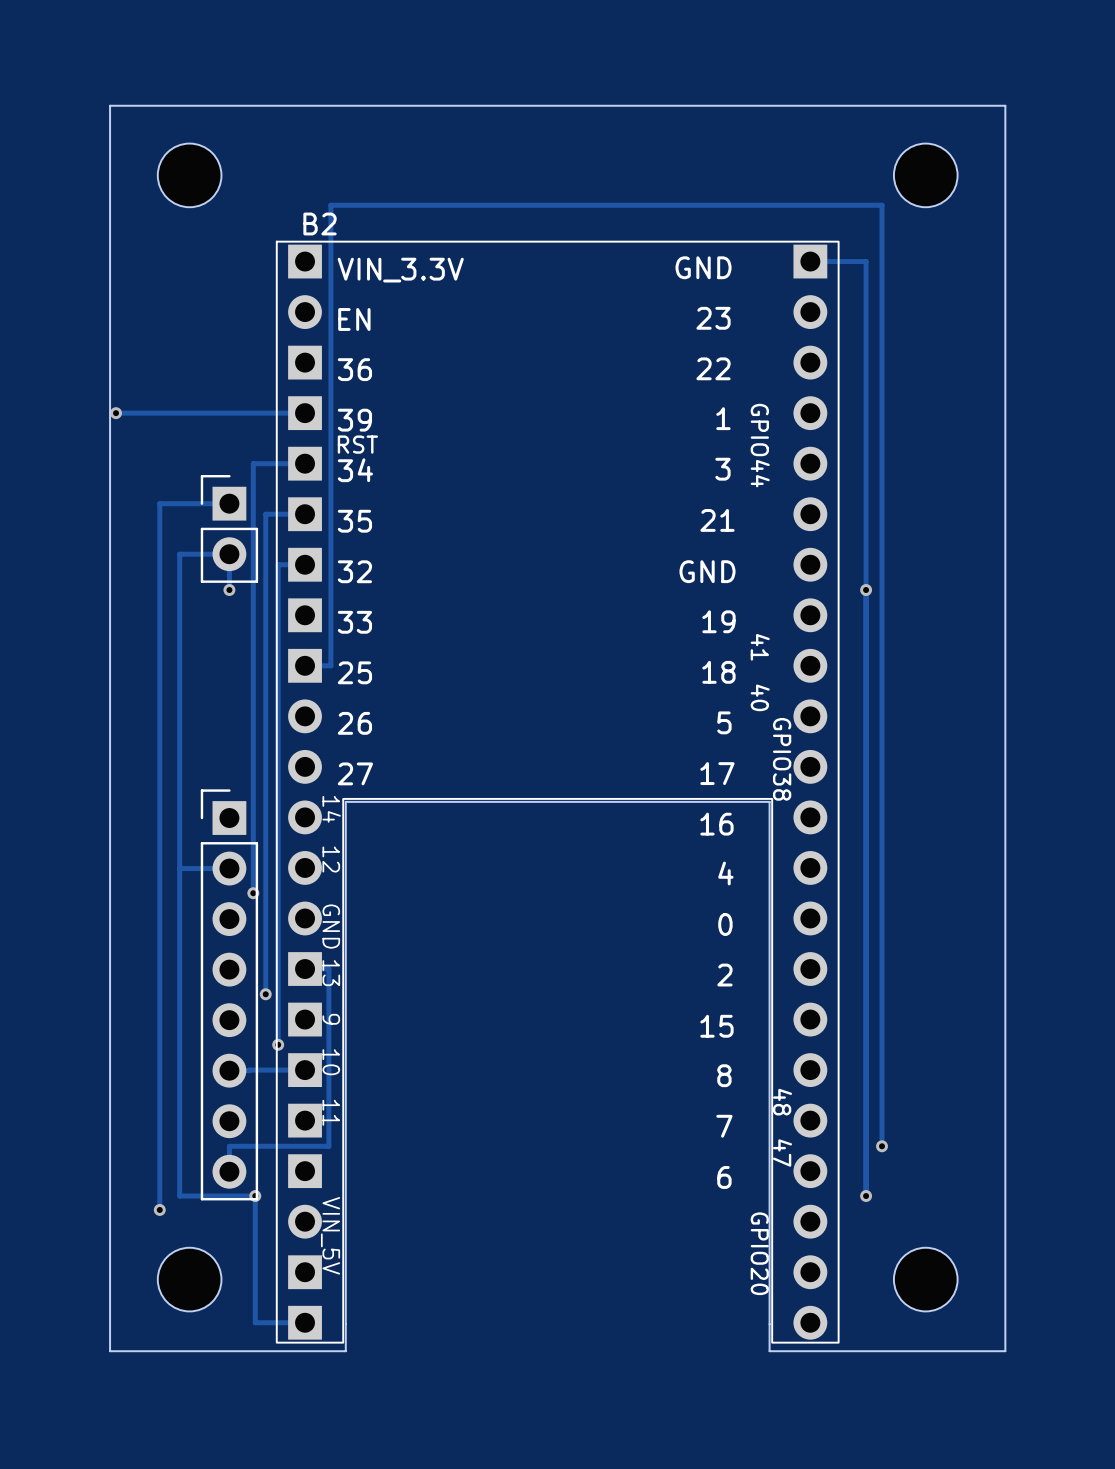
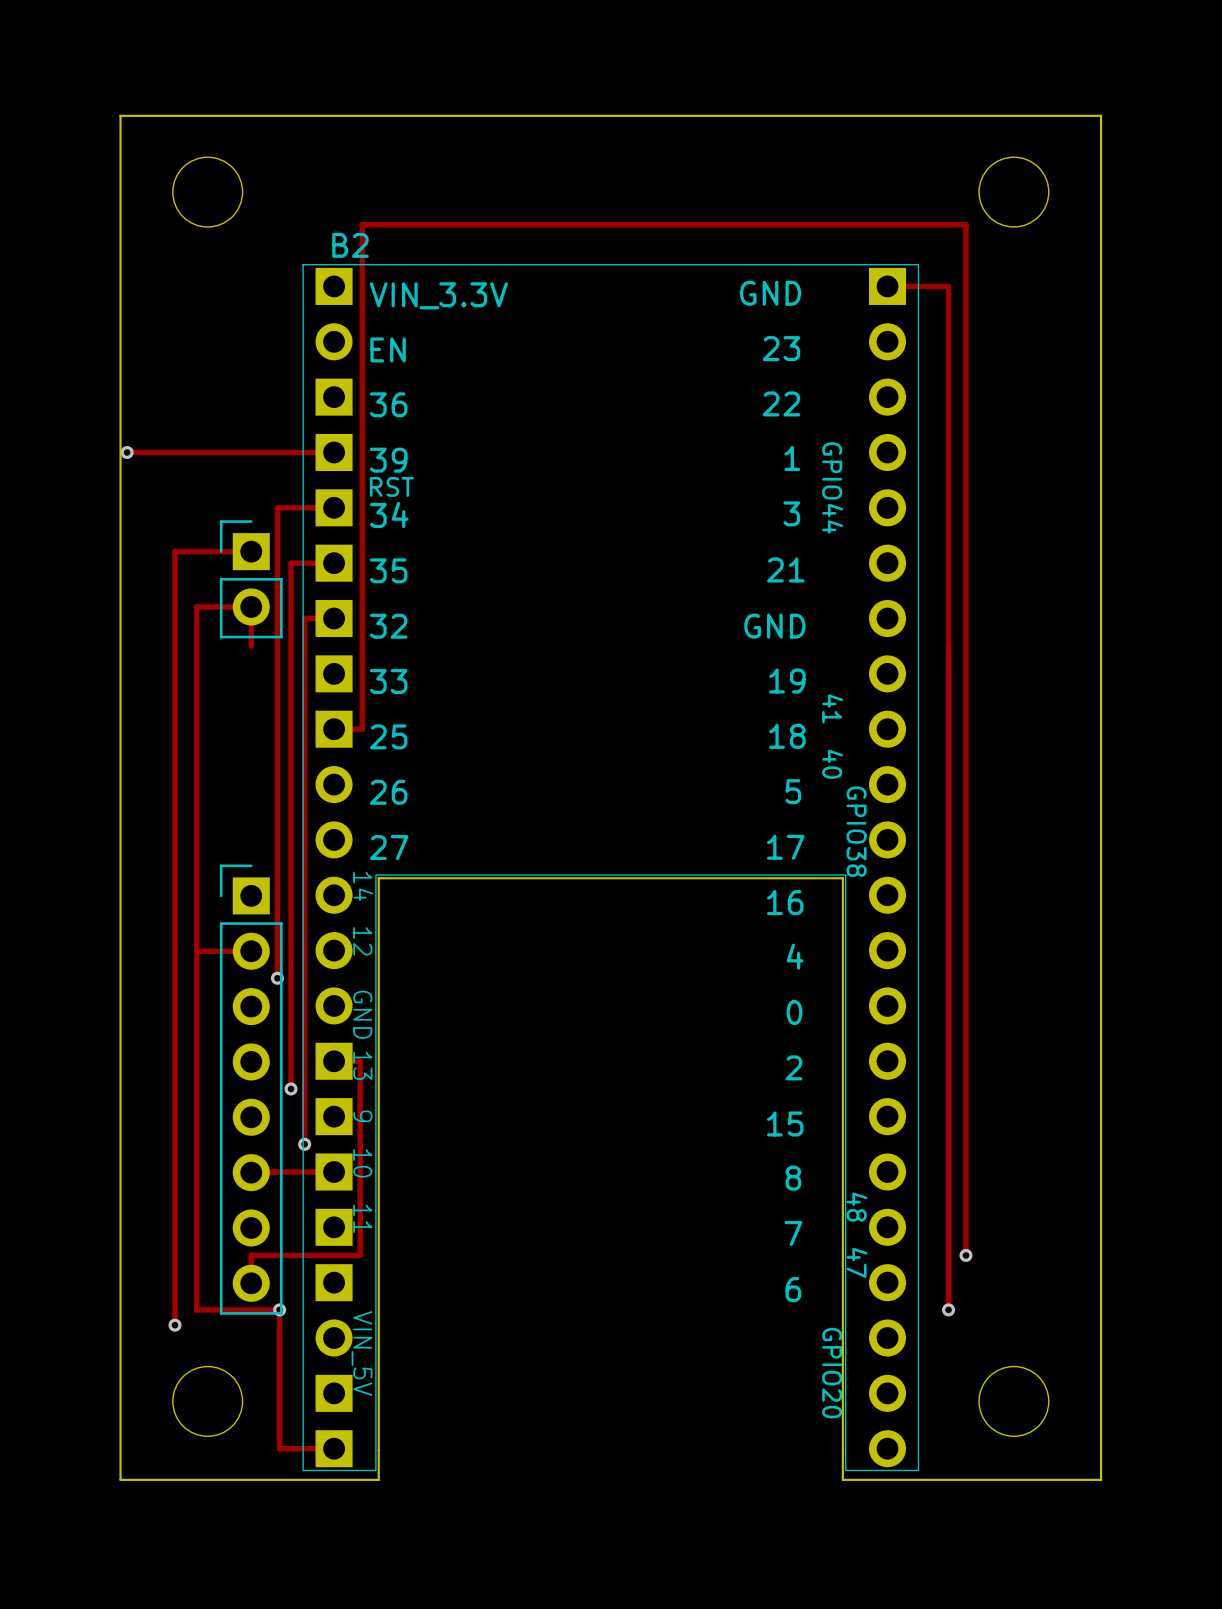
via: (229, 590) -> none
via: (866, 590) -> none

